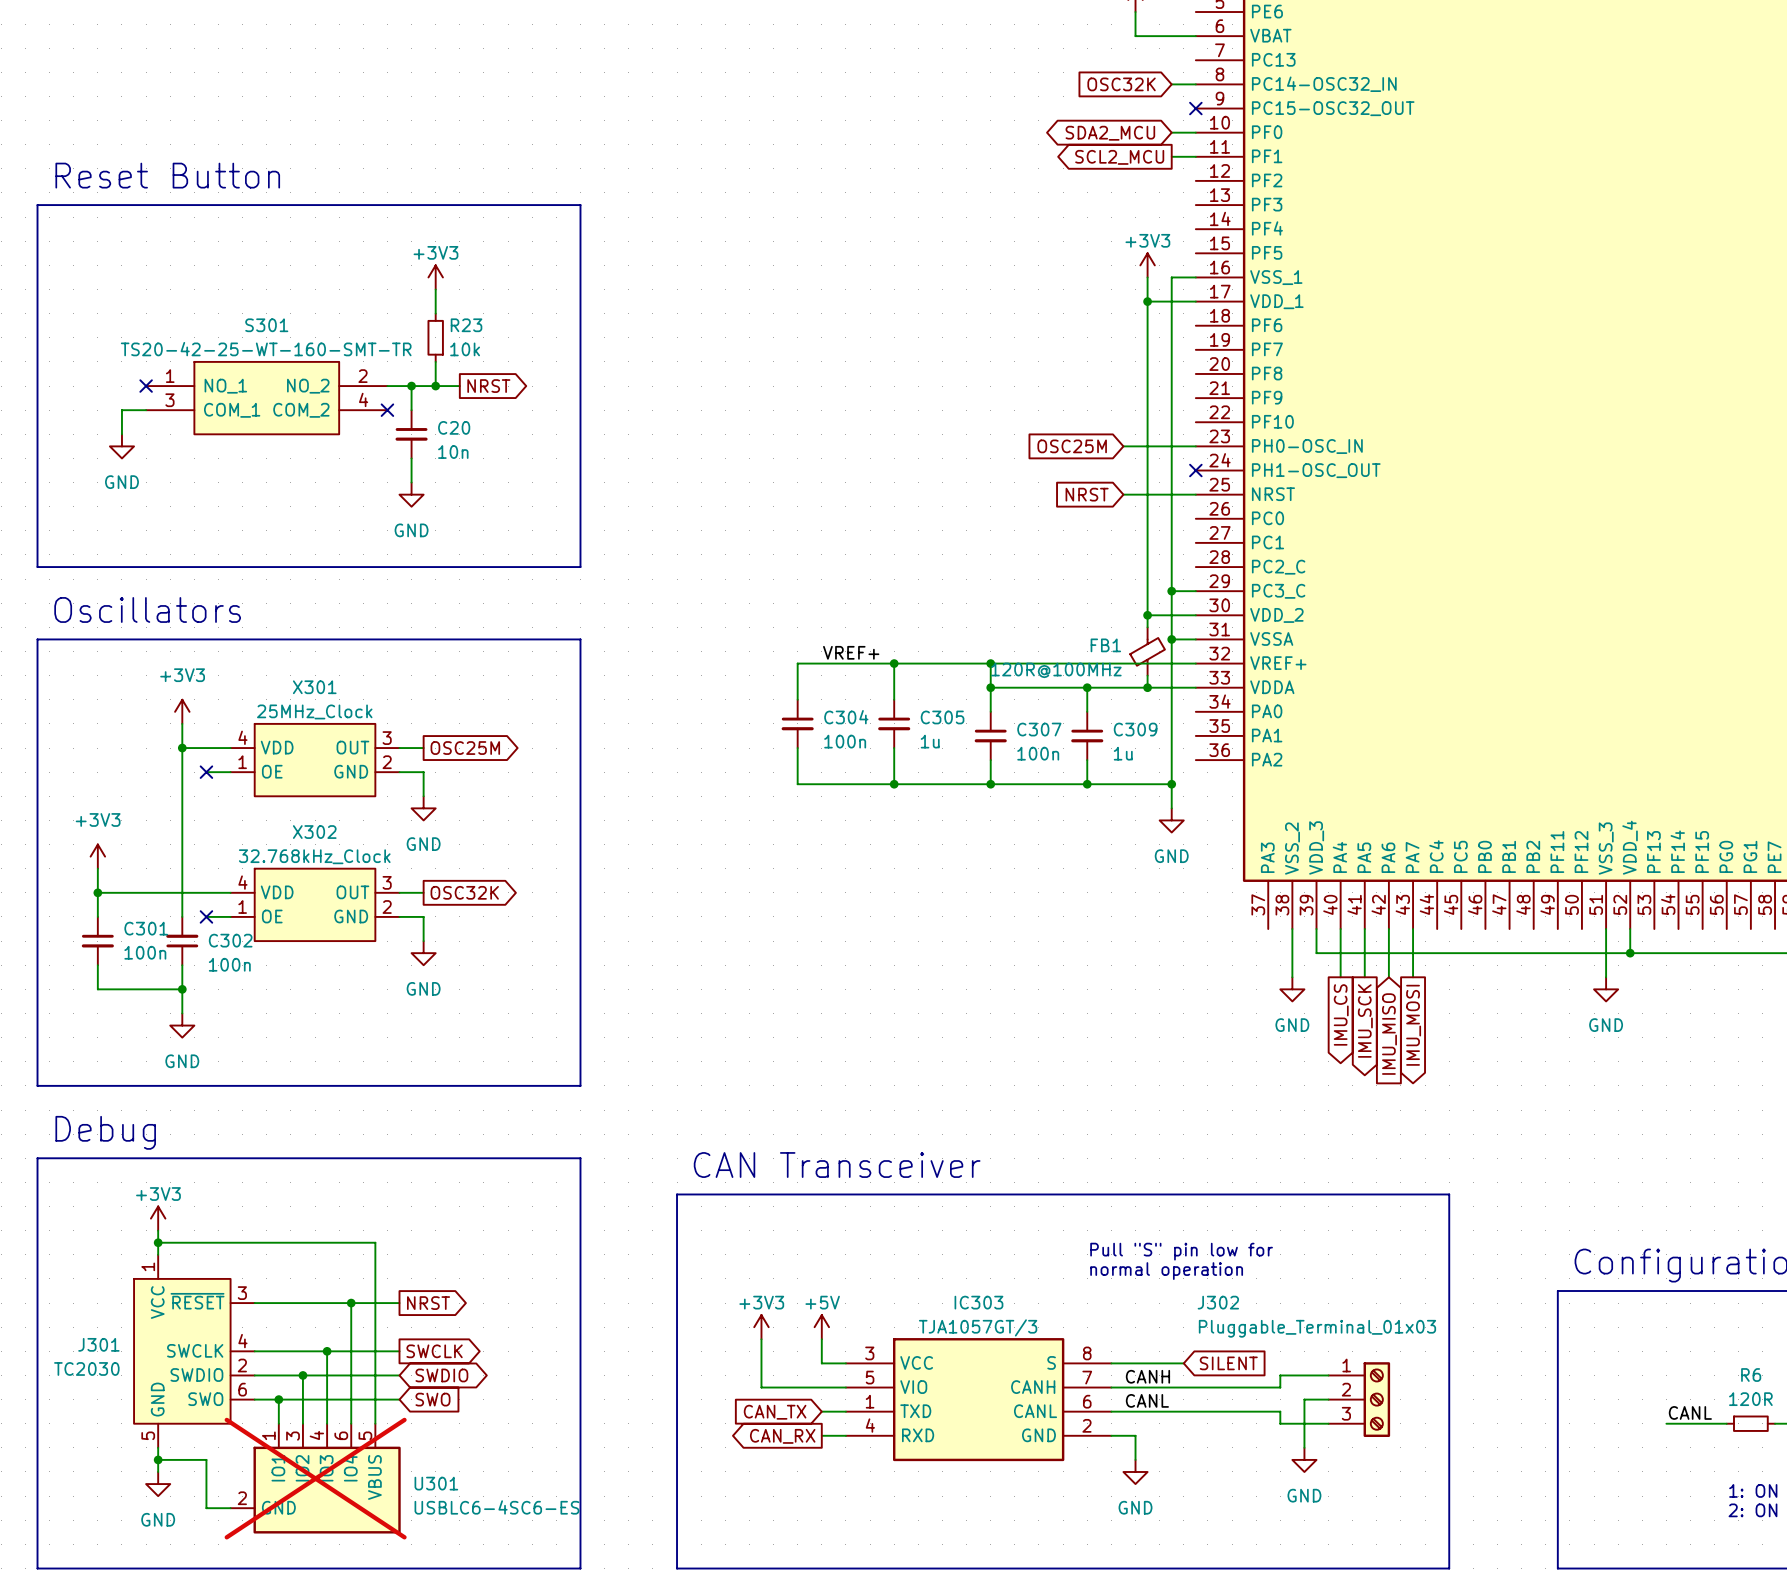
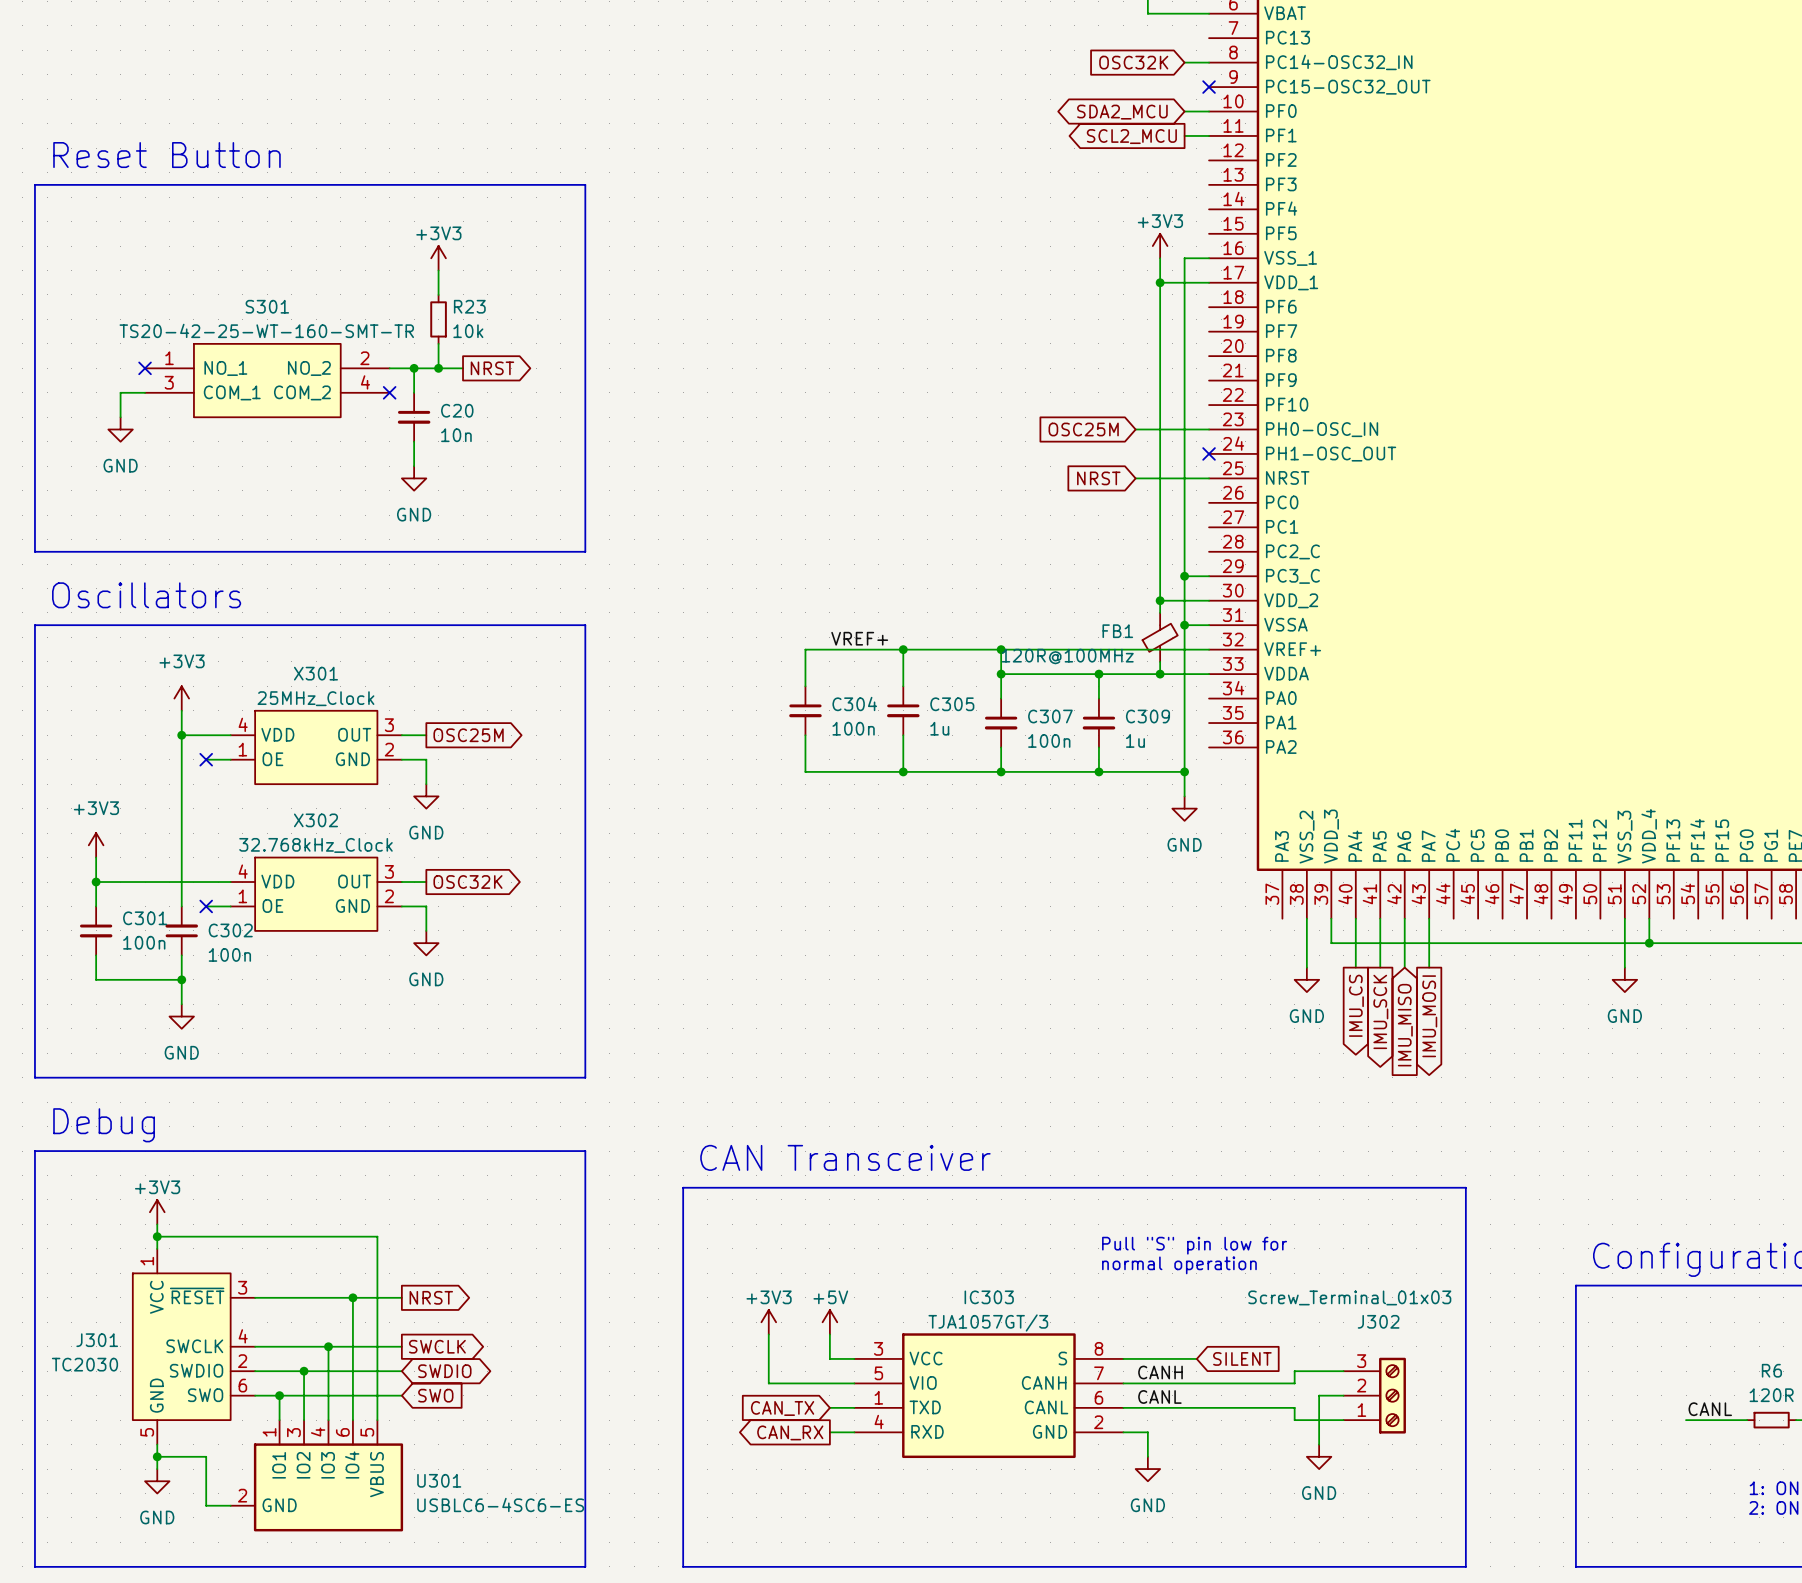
J302 name position: J302 (1218, 1302) -> J302 (1378, 1321)
J302 value: Pluggable_Terminal_01x03 (1317, 1328) -> Screw_Terminal_01x03 (1349, 1297)
J302 flip: as is (1376, 1399) -> up-down (1392, 1395)
U301 do-not-place cross: (315, 1478) -> none

